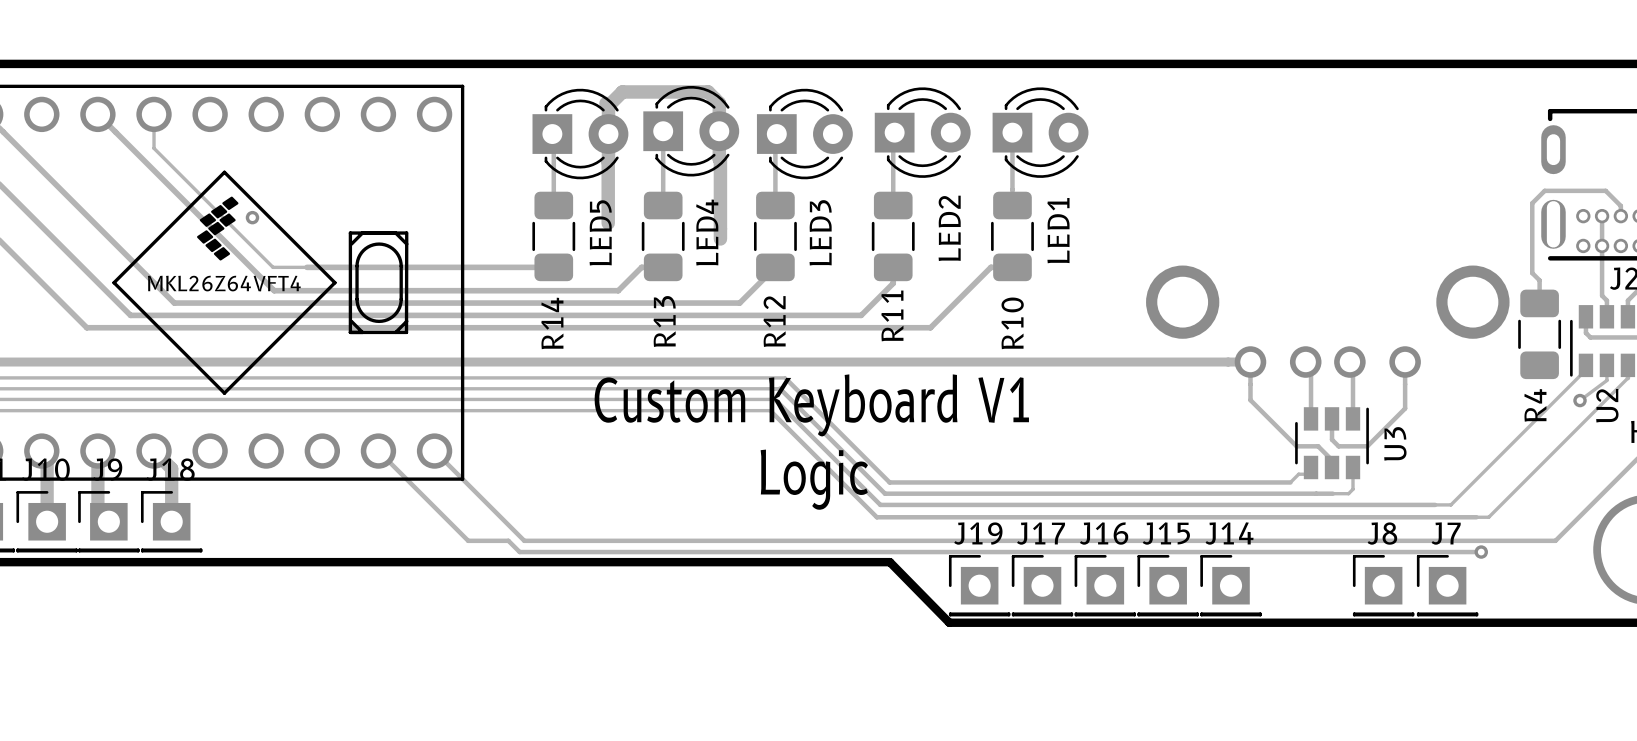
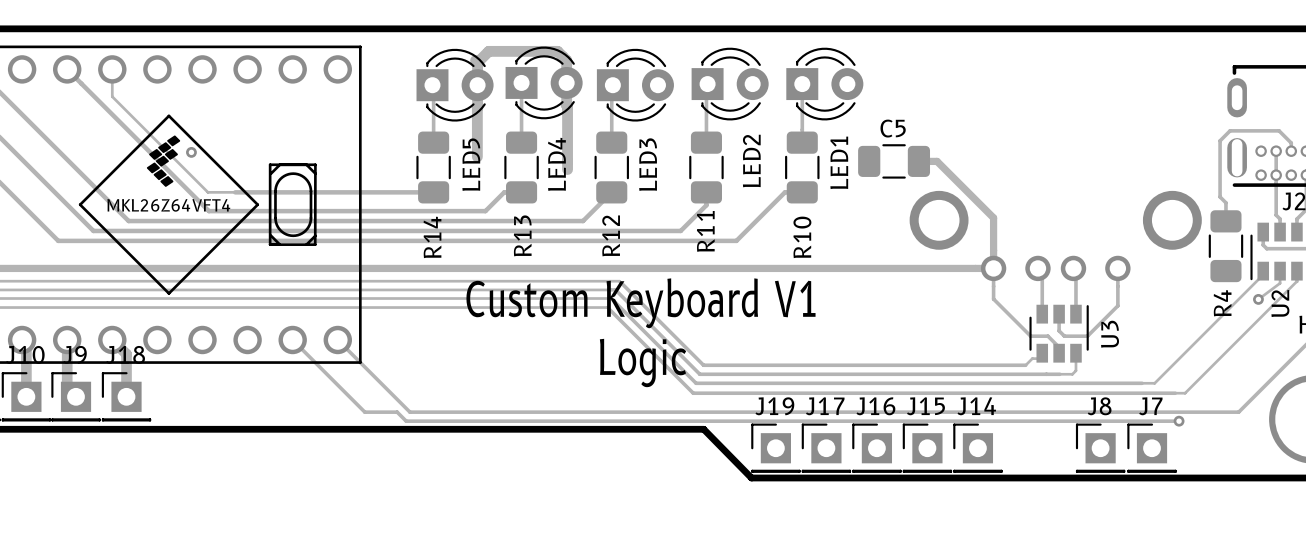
C5: none -> (894, 161)
track: none -> (918, 161) (937, 161) (993, 217) (993, 268)

